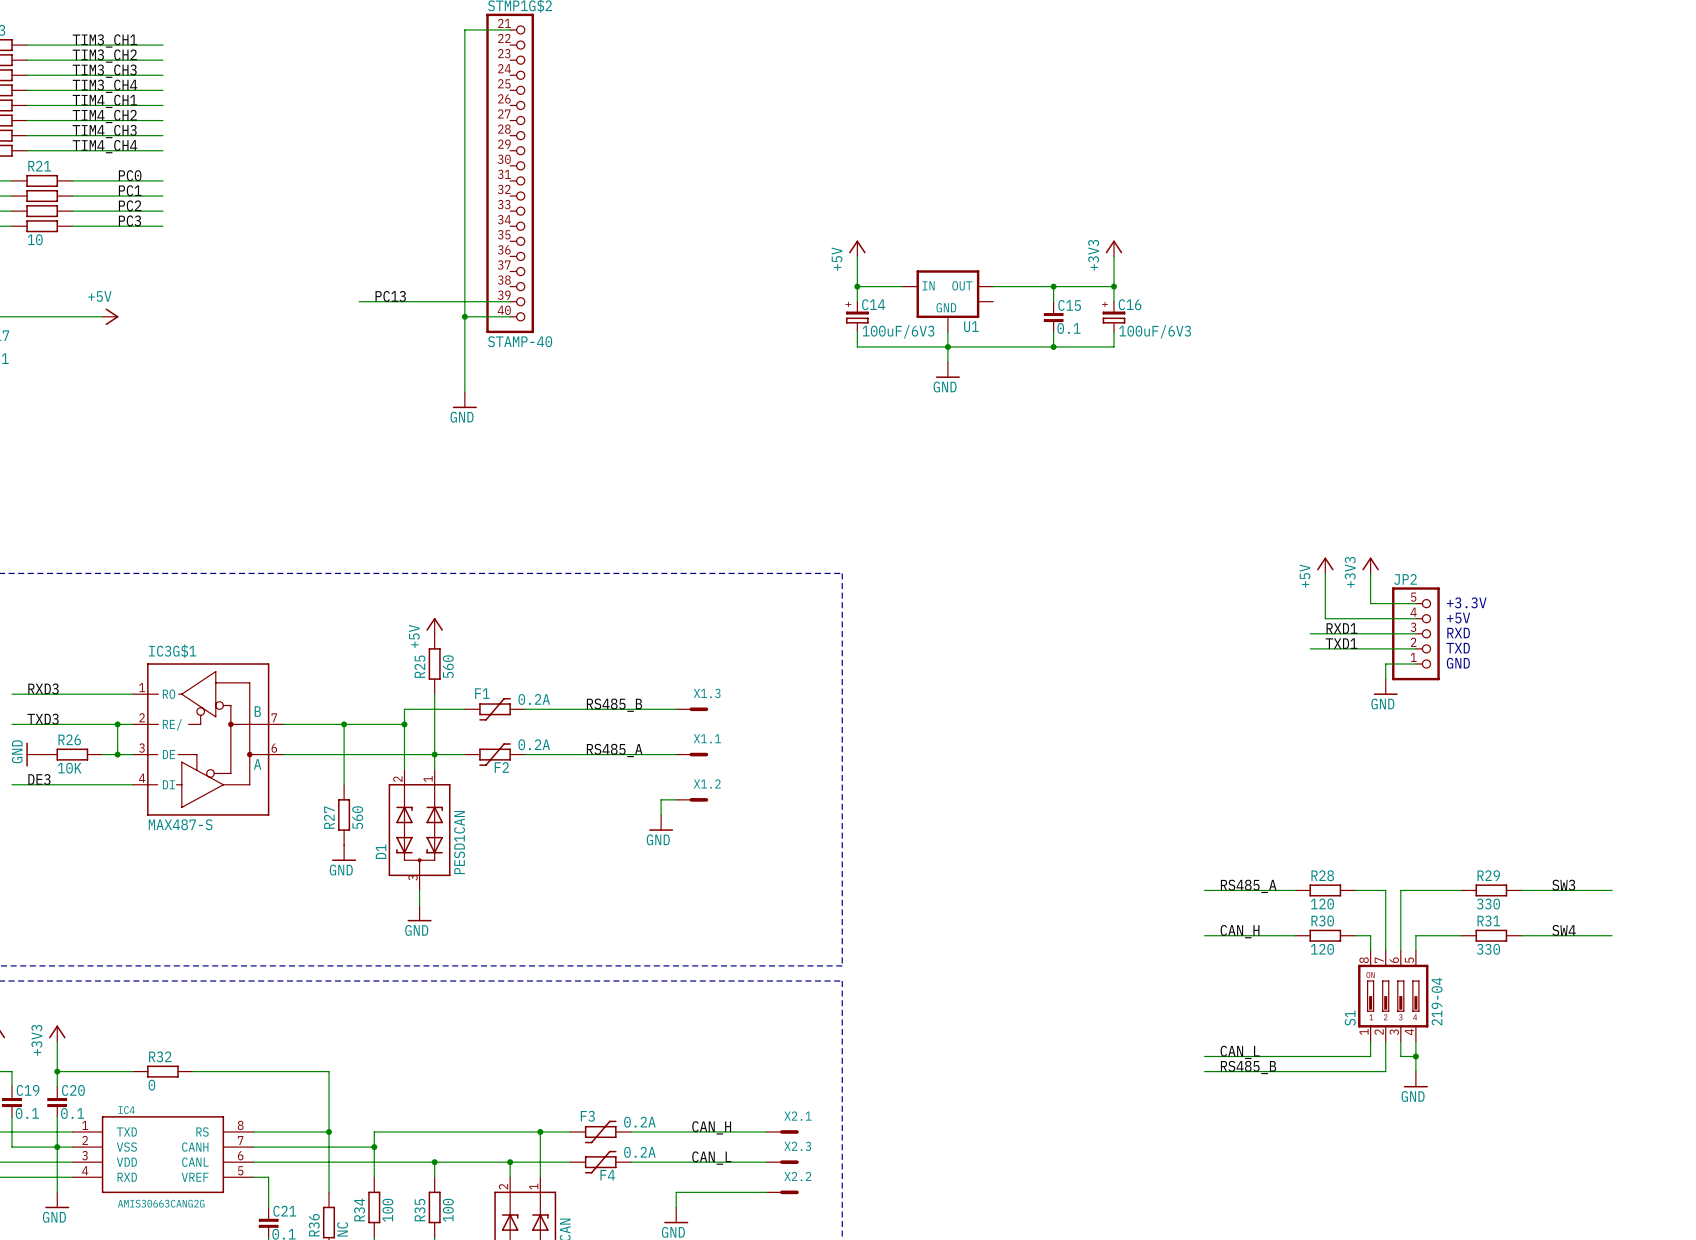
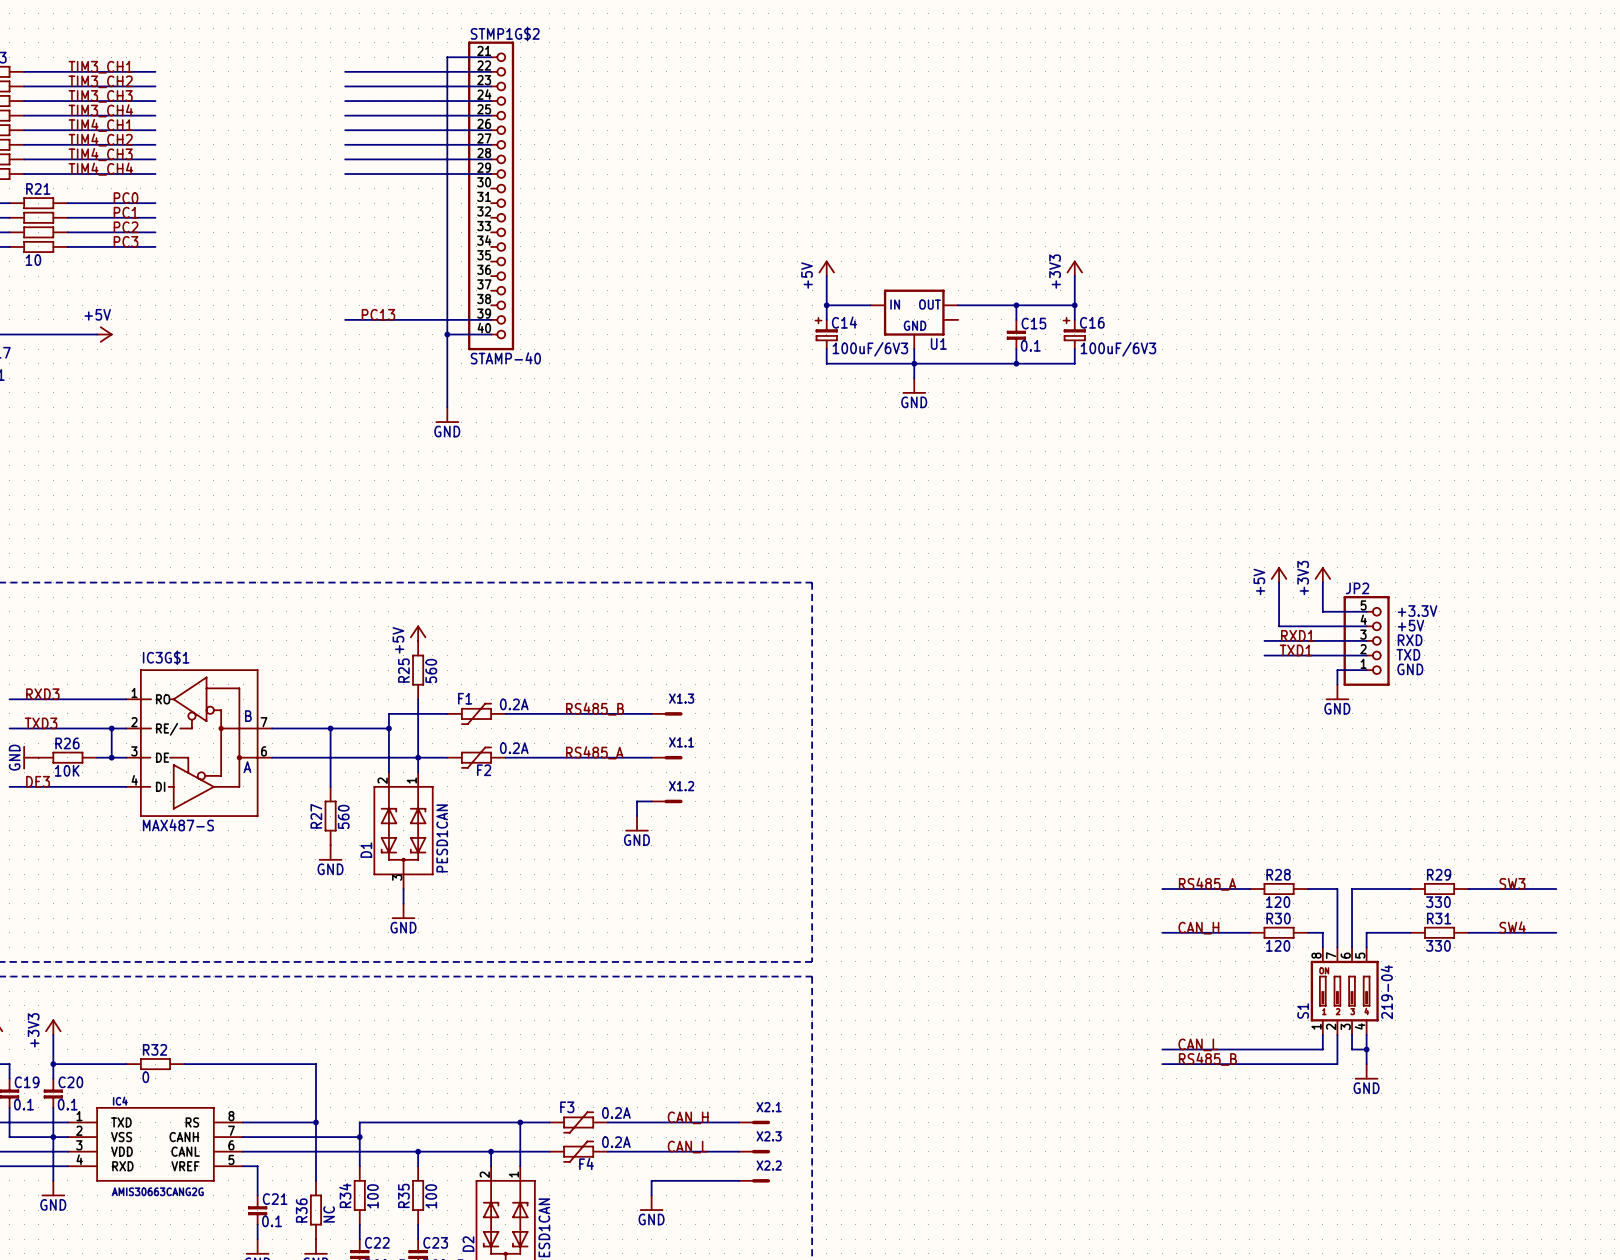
wire: none -> (345, 71) (491, 71)
wire: none -> (345, 86) (491, 86)
wire: none -> (345, 101) (491, 101)
wire: none -> (345, 115) (491, 115)
wire: none -> (345, 130) (491, 130)
wire: none -> (345, 144) (491, 144)
wire: none -> (345, 159) (491, 159)
wire: none -> (345, 174) (491, 174)

